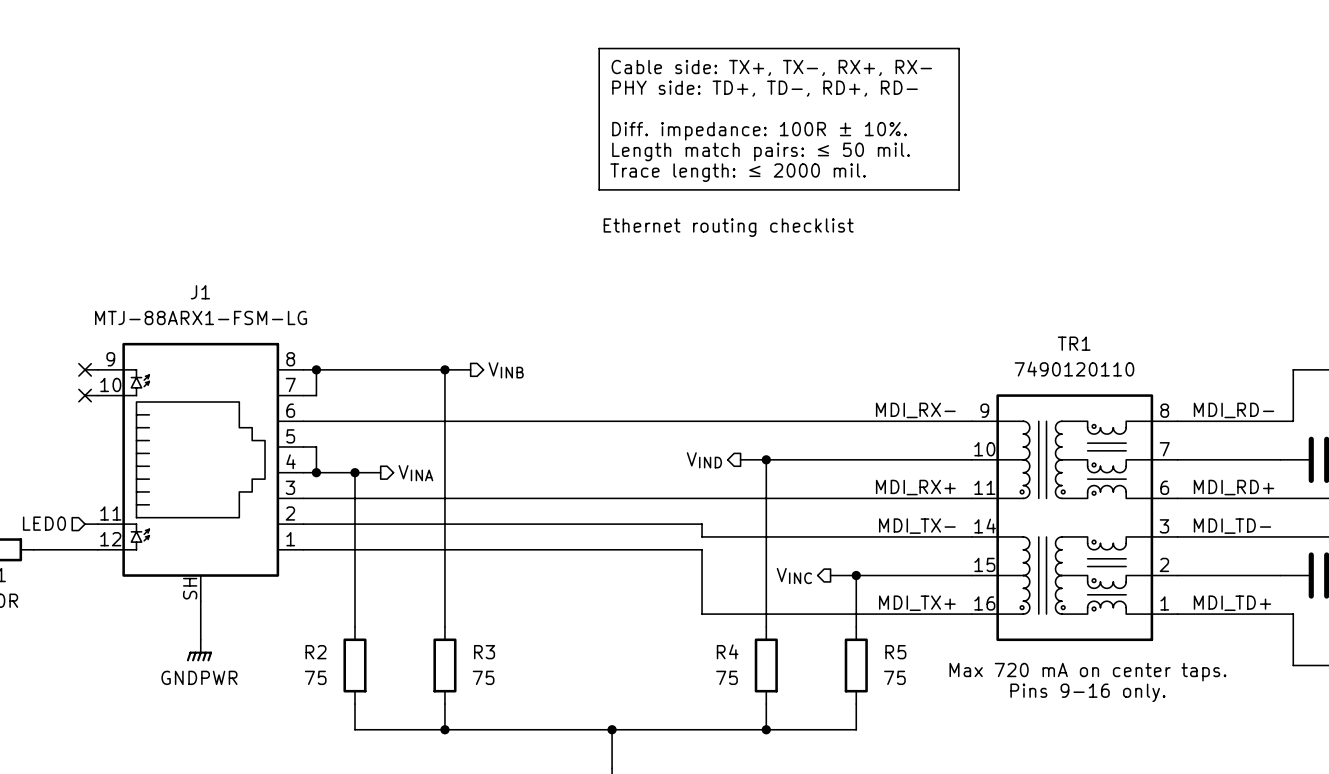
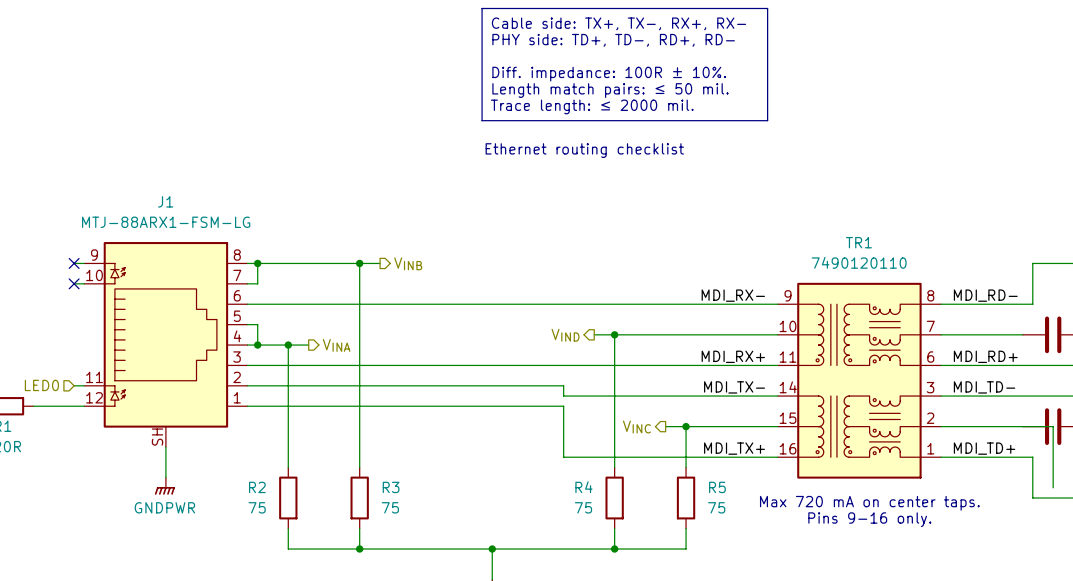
wire: none -> (1022, 426) (1053, 426) (1053, 487)

